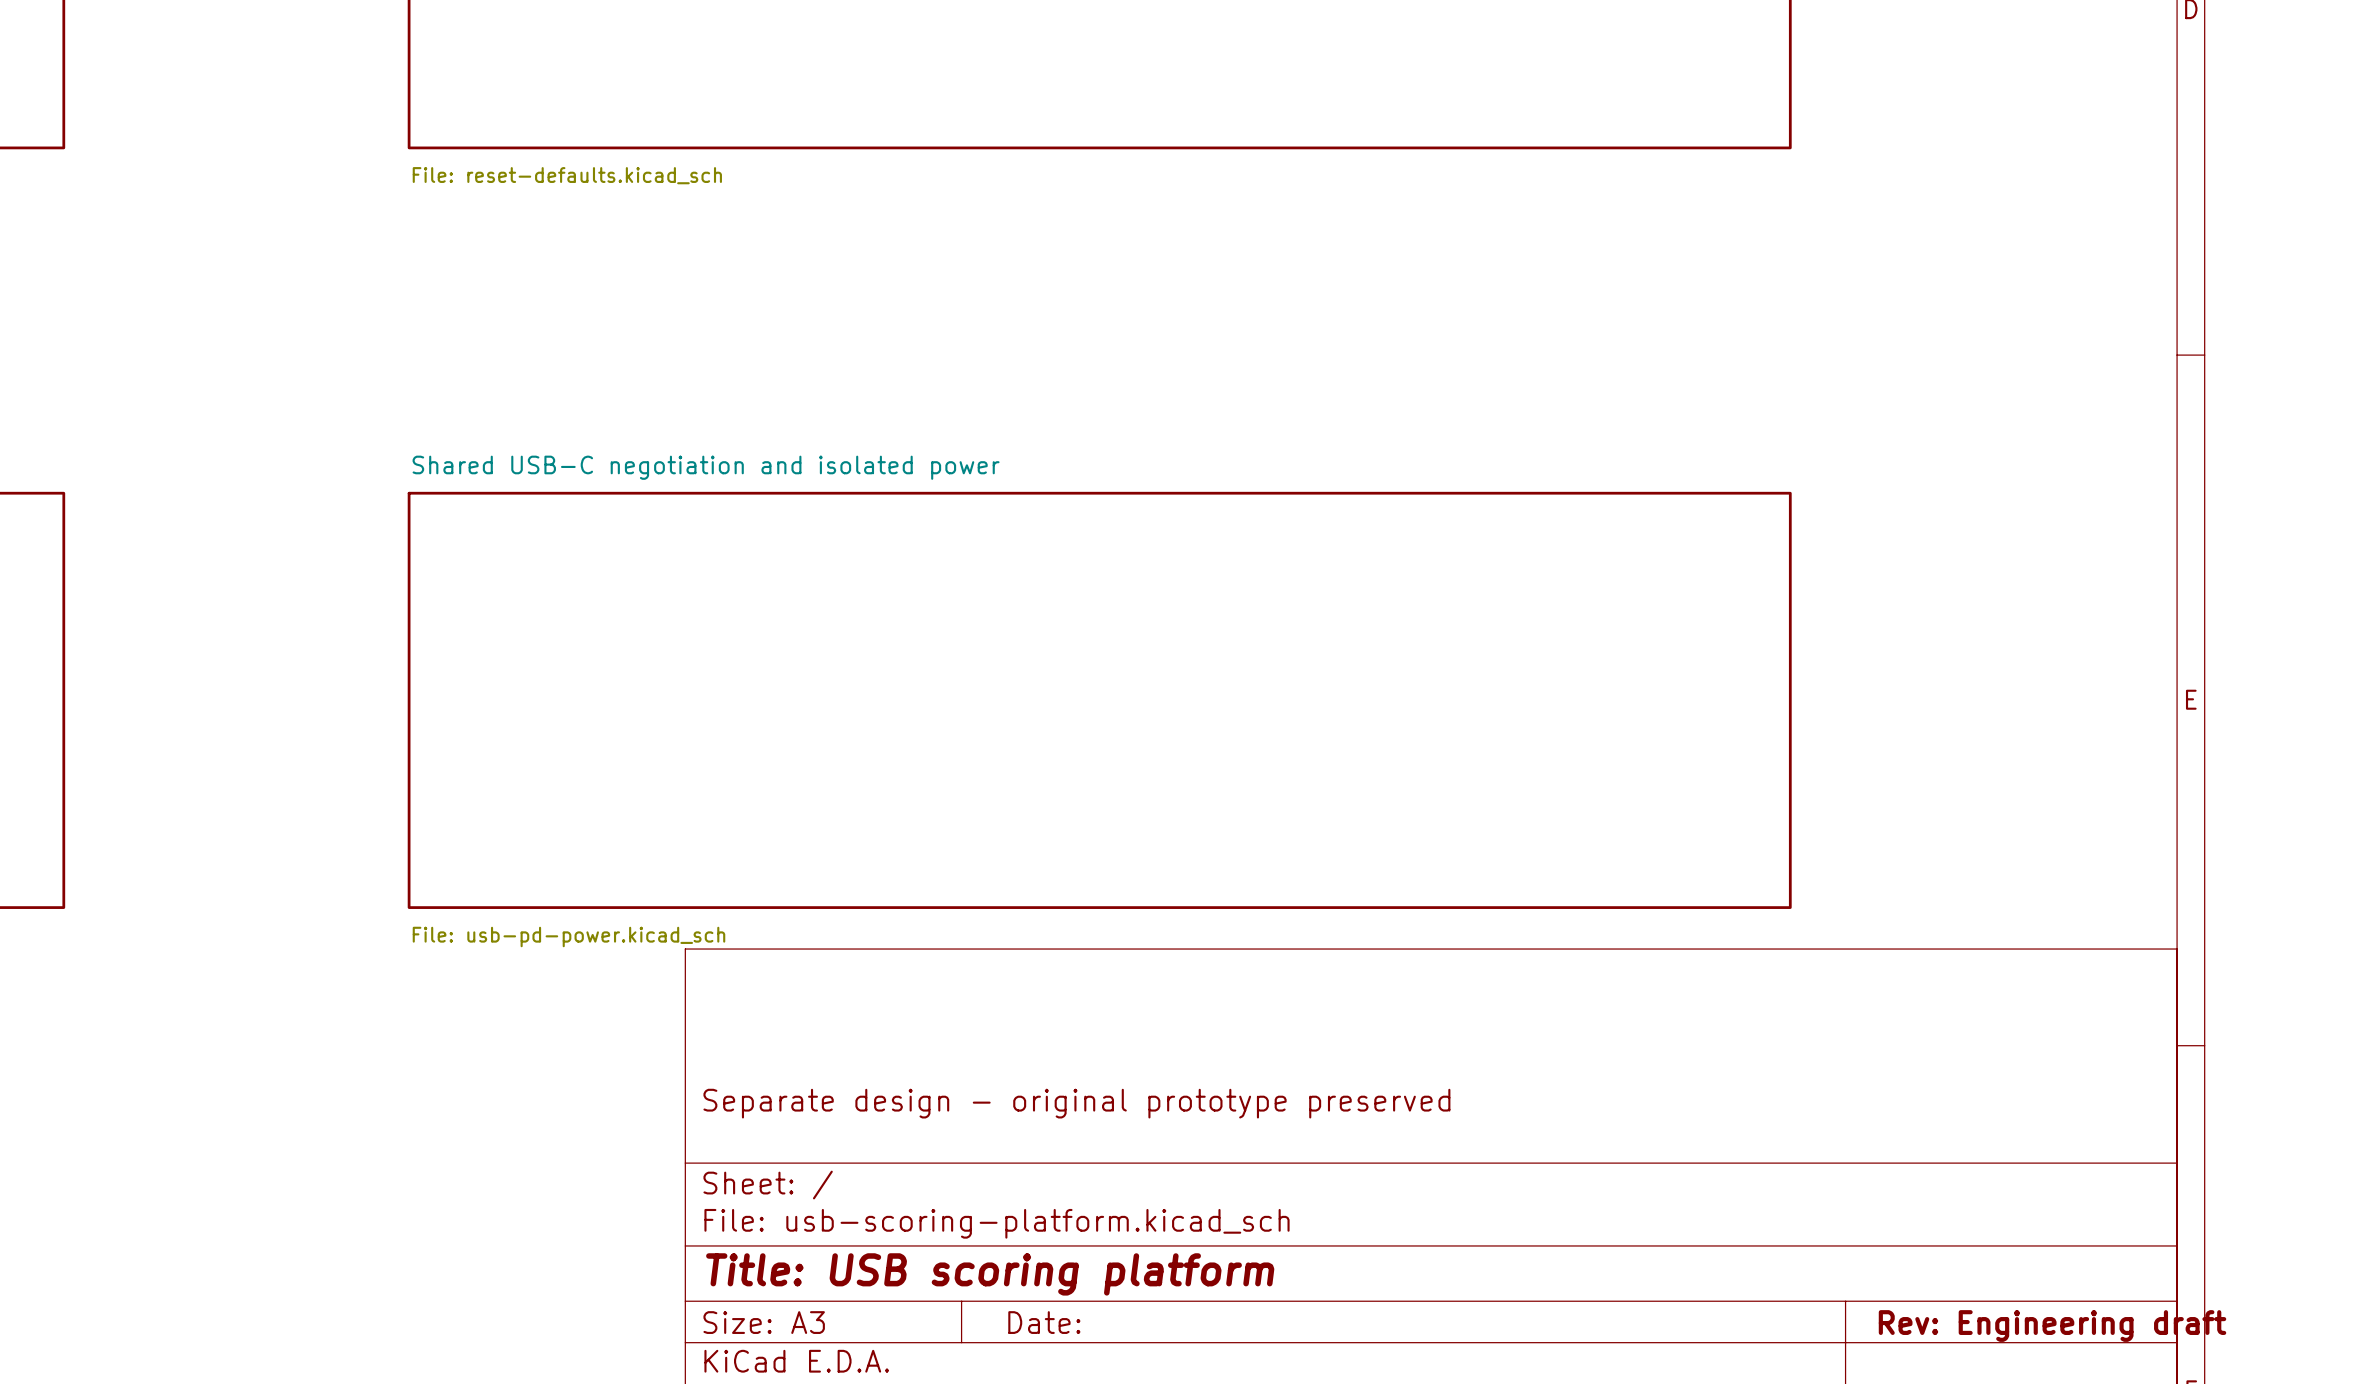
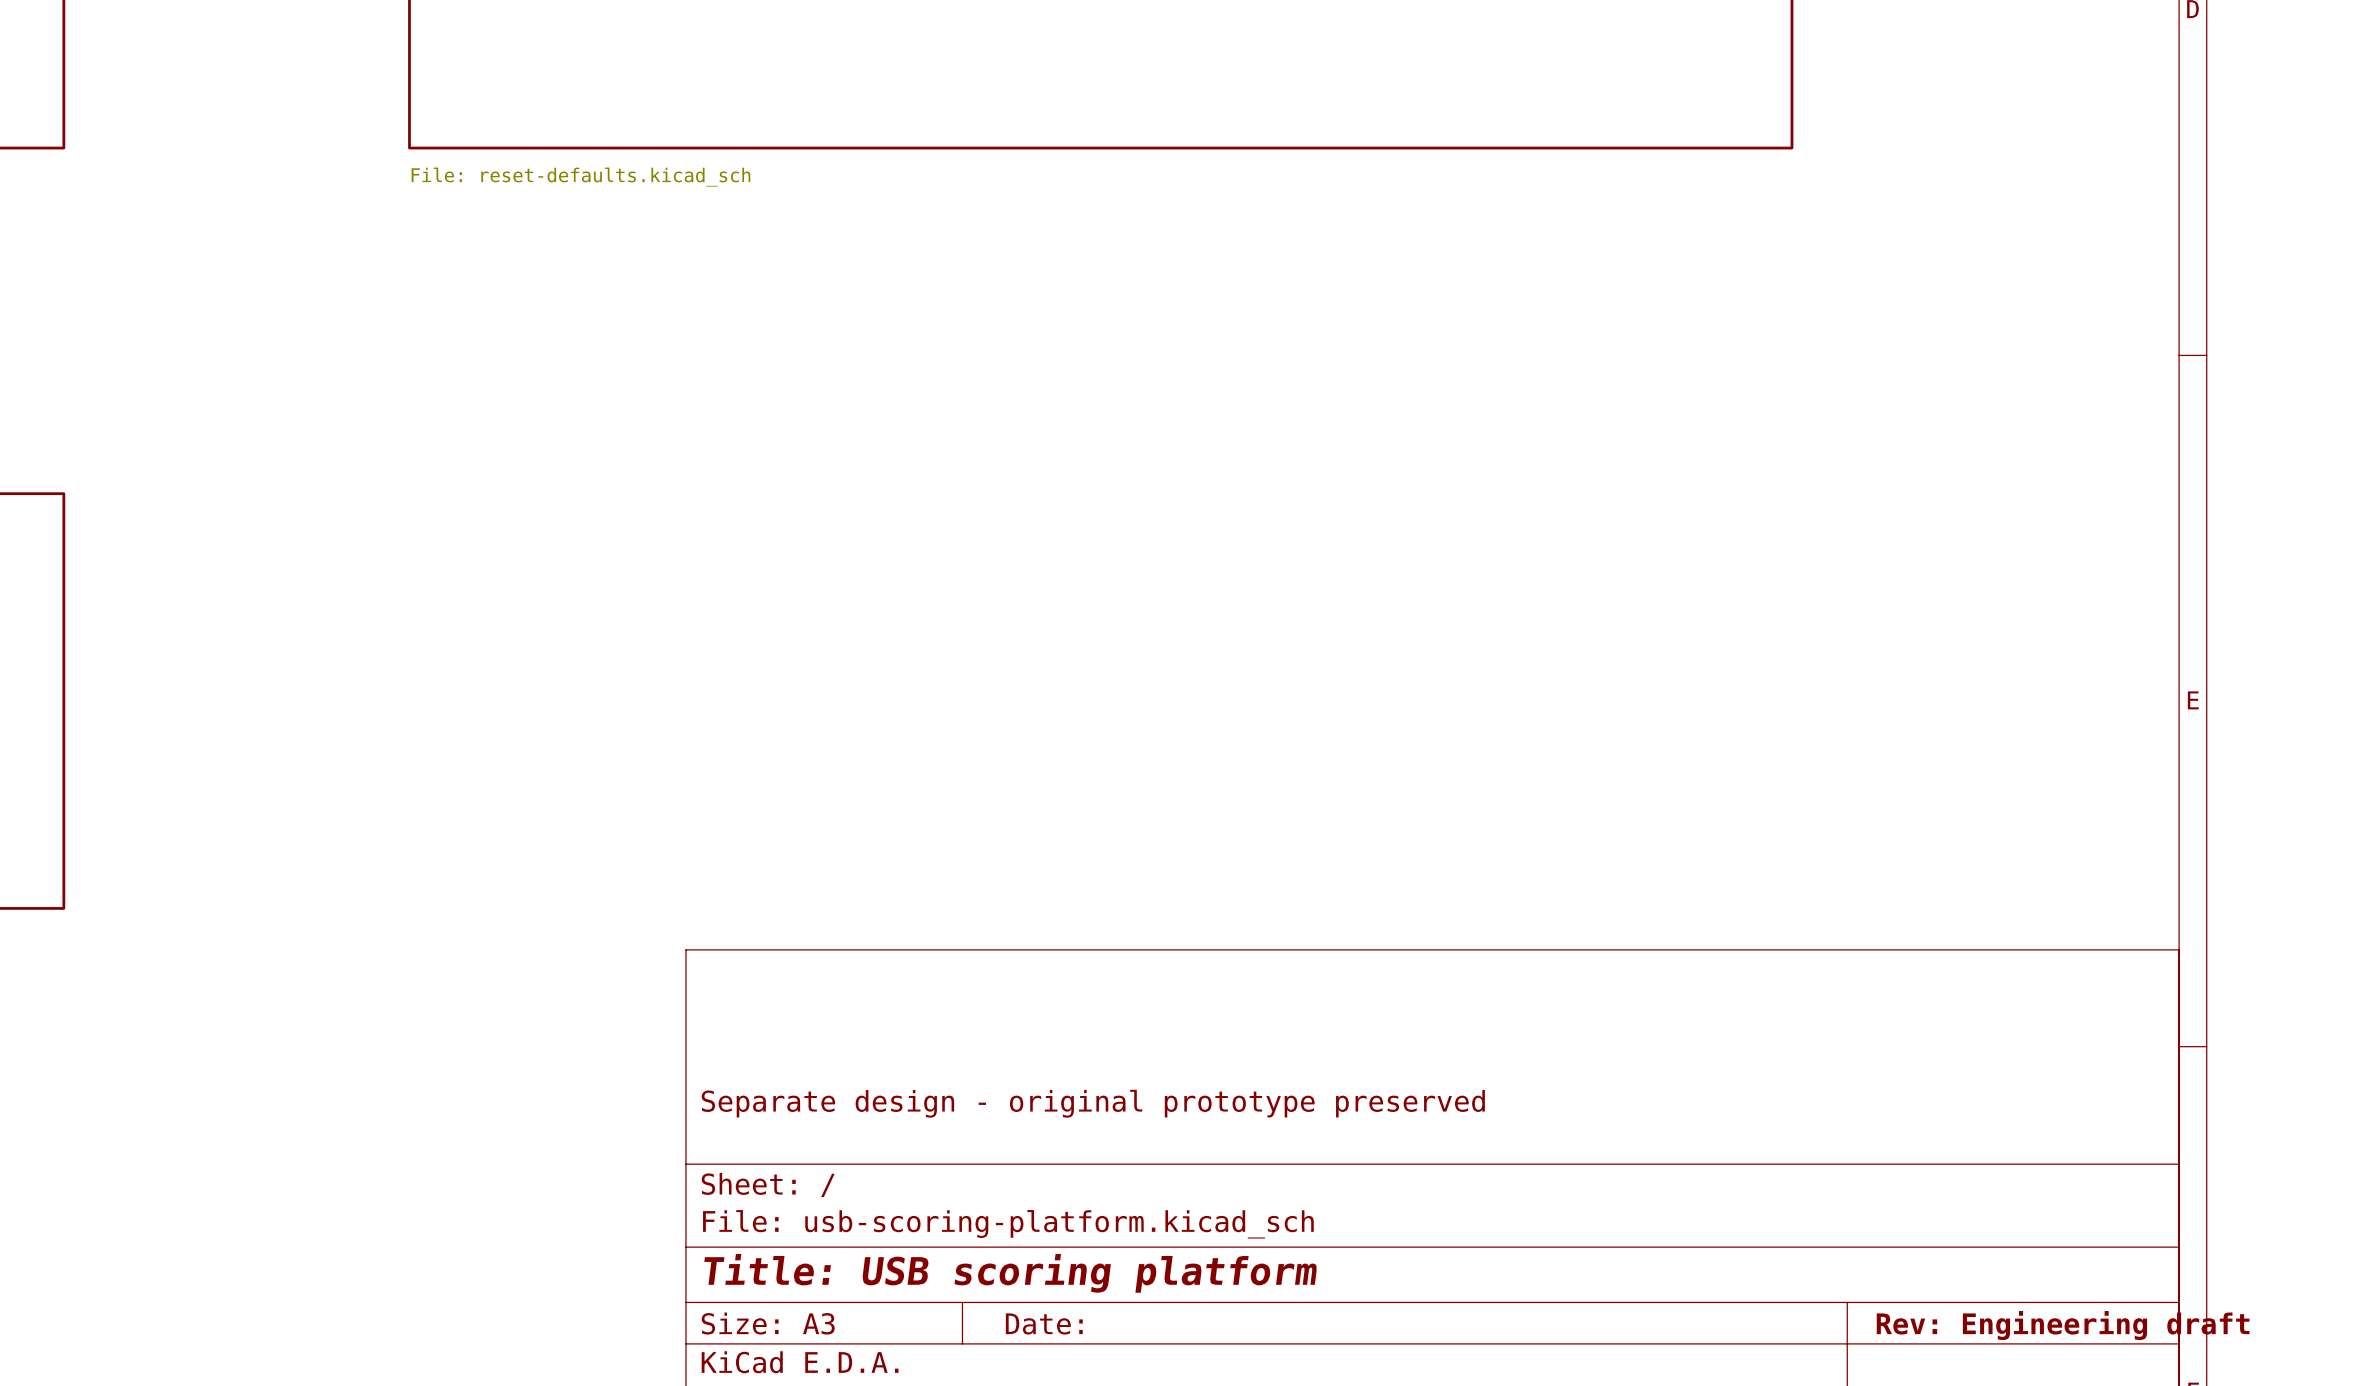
sheet Shared USB-C negotiation and isolated power: File: usb-pd-power.kicad_sch (1099, 700) -> none

